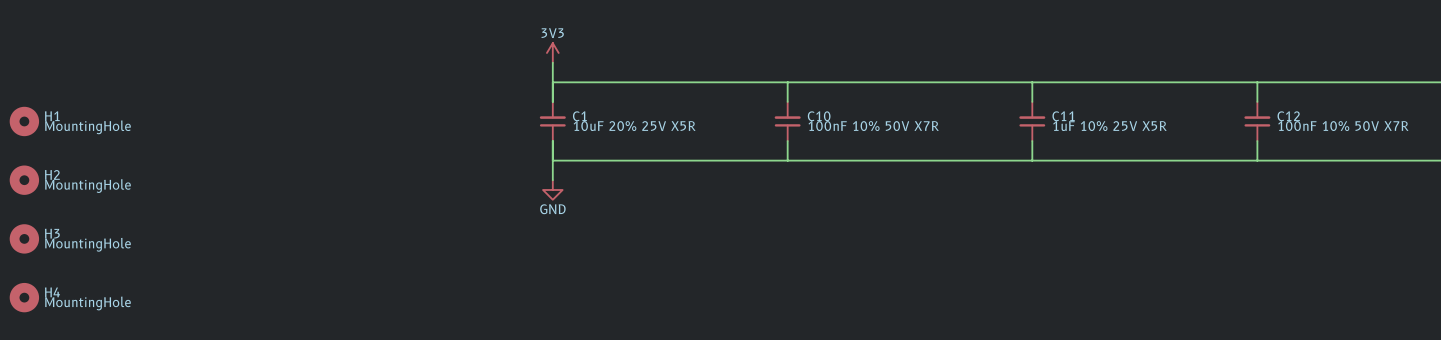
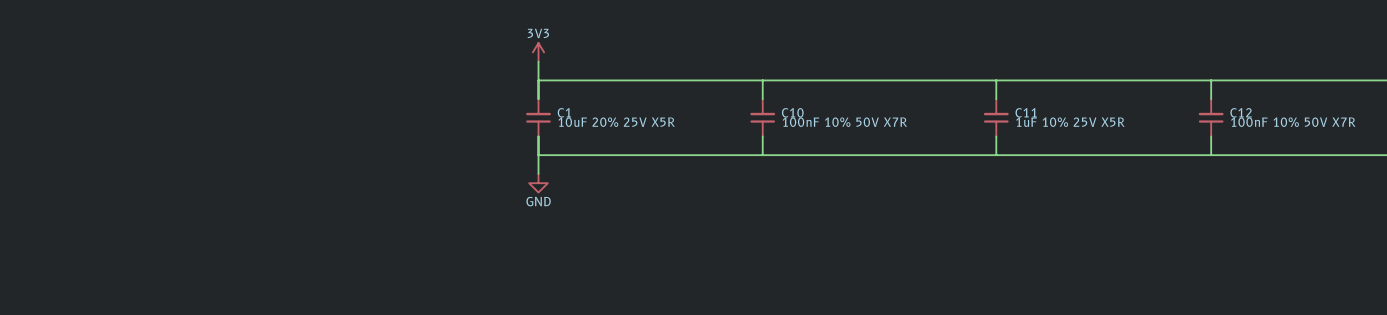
H1: MountingHole (24, 121) -> none
H2: MountingHole (24, 180) -> none
H3: MountingHole (24, 238) -> none
H4: MountingHole (24, 297) -> none

